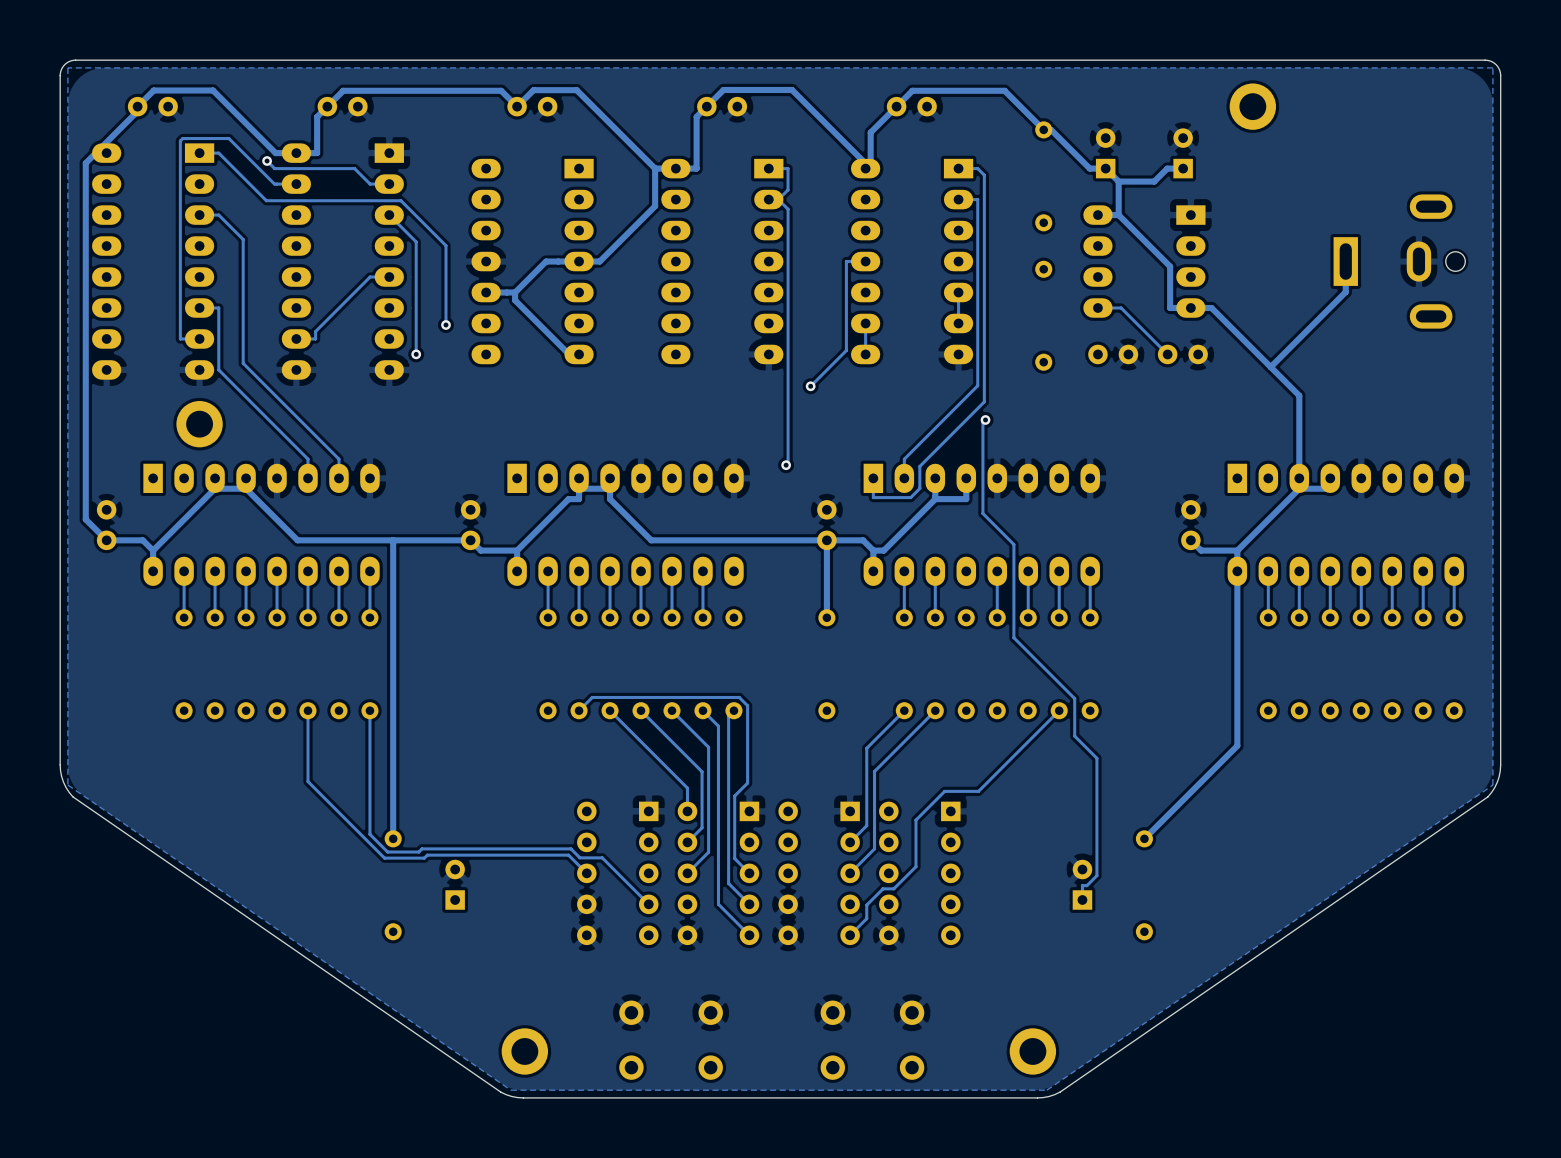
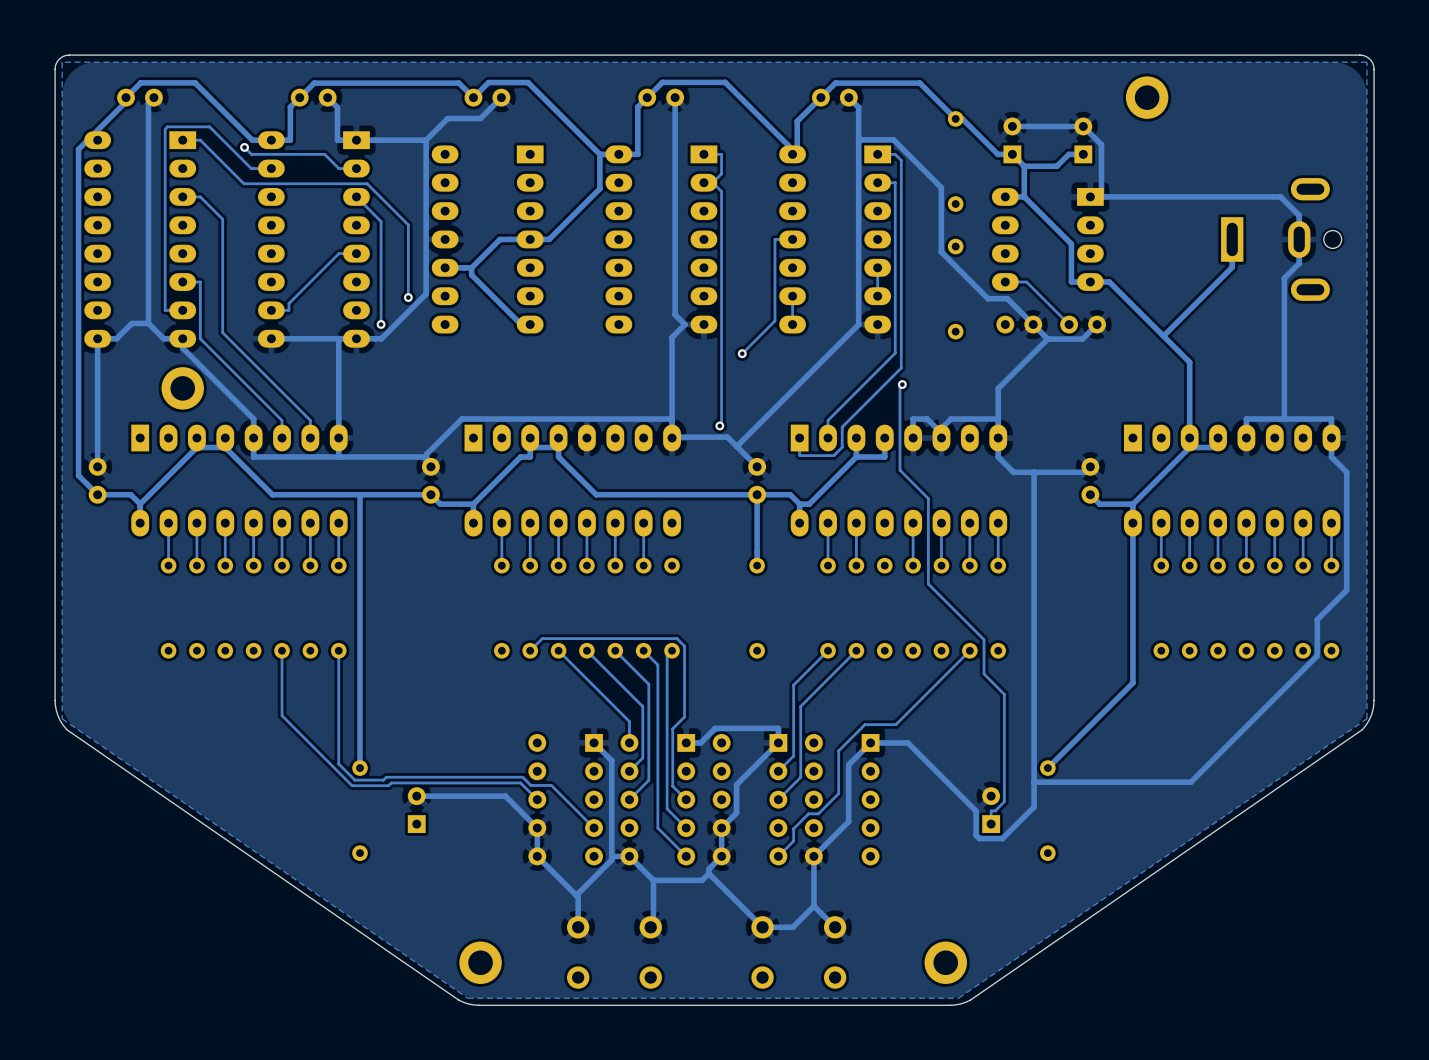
track: none -> (153, 97) (148, 103) (148, 323)
track: none -> (327, 97) (337, 107) (337, 140) (426, 140)
track: none -> (501, 97) (480, 118) (447, 118) (426, 140)
track: none -> (675, 97) (675, 314) (684, 324) (672, 337) (672, 438)
track: none -> (848, 97) (858, 107) (858, 324) (736, 446)
track: none -> (1012, 126) (1083, 126) (1101, 144) (1101, 196)
track: none -> (858, 139) (893, 139) (941, 187) (941, 252) (988, 298) (1007, 298) (1047, 339)
track: none -> (426, 140) (426, 294) (381, 338) (271, 338)
track: none -> (1090, 196) (1280, 196) (1299, 215) (1299, 263) (1284, 278) (1284, 419)
track: none -> (148, 323) (131, 323) (116, 338) (97, 338) (97, 466)
track: none -> (148, 323) (163, 338) (182, 338) (182, 348) (253, 419) (253, 457) (426, 457)
track: none -> (1097, 324) (1082, 339) (1047, 339)
track: none -> (338, 338) (338, 457)
track: none -> (1047, 339) (998, 388) (998, 457) (1013, 472) (1084, 472) (1090, 466)
track: none -> (672, 419) (461, 419) (426, 454) (426, 462) (430, 466)
track: none -> (998, 419) (950, 419) (941, 428) (941, 438)
track: none -> (941, 433) (927, 419) (913, 419) (913, 438)
track: none -> (672, 437) (727, 437) (757, 466)
track: none -> (1246, 438) (1246, 419) (1331, 419) (1331, 457) (1346, 472) (1346, 590) (1317, 619) (1317, 655) (1190, 782) (1034, 782)
track: none -> (1034, 472) (1034, 806) (1002, 838) (979, 838) (976, 835) (976, 811) (907, 742) (870, 742) (848, 764) (848, 821) (813, 856) (813, 906)
track: none -> (594, 742) (611, 760) (611, 860) (576, 895)
track: none -> (686, 742) (700, 742) (715, 728) (778, 728) (778, 742) (736, 784) (736, 813) (721, 828) (721, 856) (708, 869) (708, 873)
track: none -> (416, 796) (505, 796) (537, 828) (537, 856) (578, 897) (578, 927)
track: none -> (611, 856) (629, 856) (653, 880)
track: none -> (708, 873) (762, 927) (792, 927) (813, 906)
track: none -> (708, 873) (701, 880) (653, 880)
track: none -> (653, 880) (653, 924) (650, 927)
track: none -> (813, 906) (835, 927)

